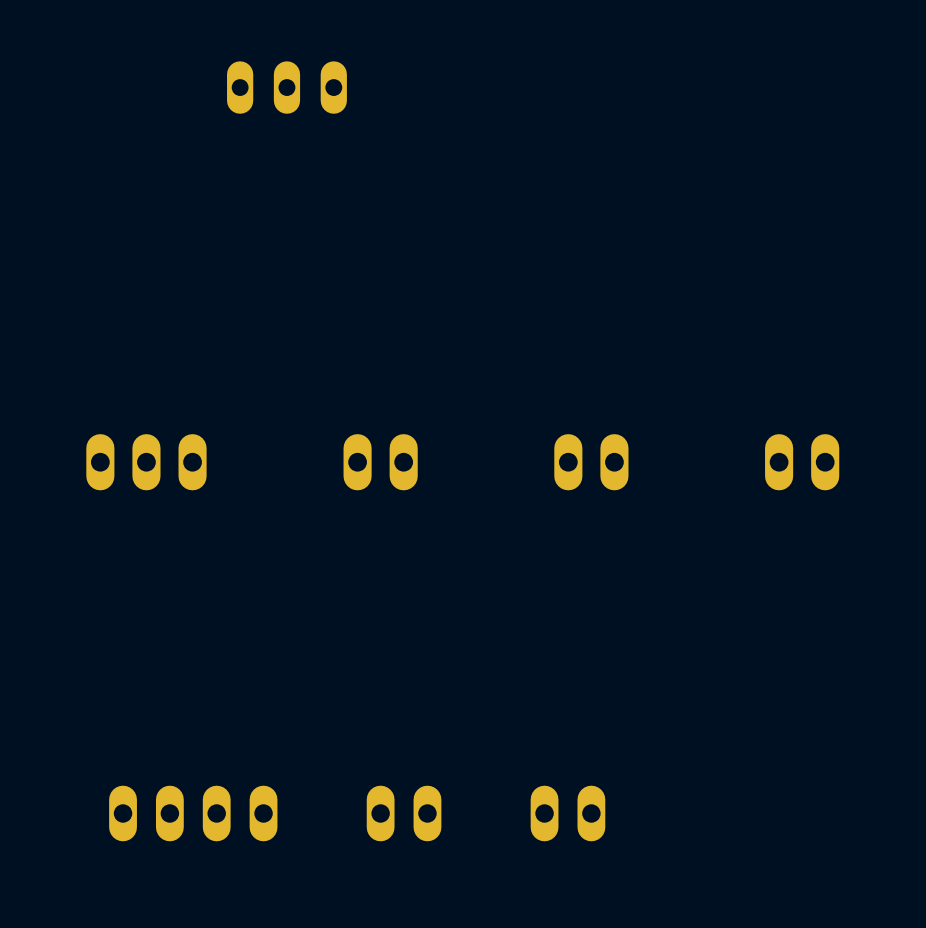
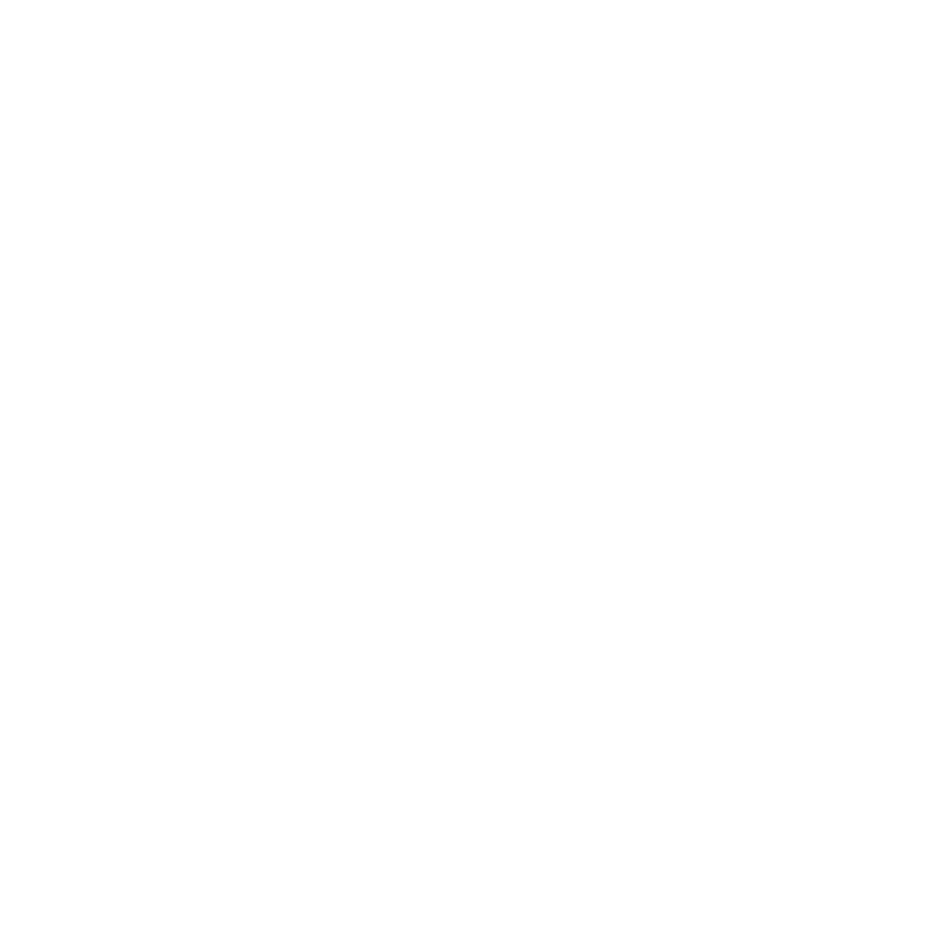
part: (286, 87) -> none
part: (146, 462) -> none
part: (380, 462) -> none
part: (591, 462) -> none
part: (802, 462) -> none
part: (193, 813) -> none
part: (404, 813) -> none
part: (567, 813) -> none

